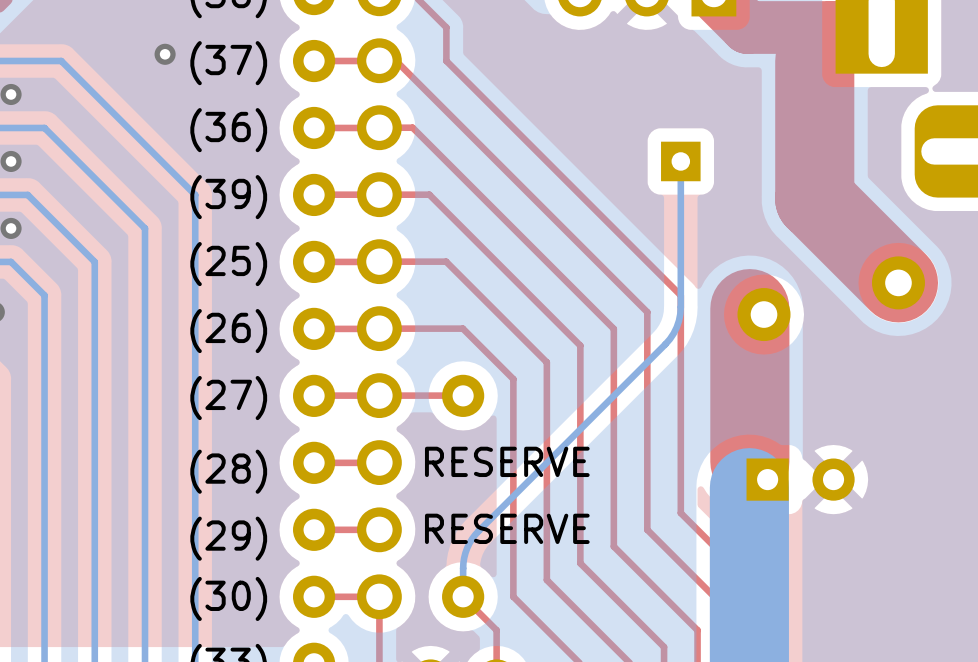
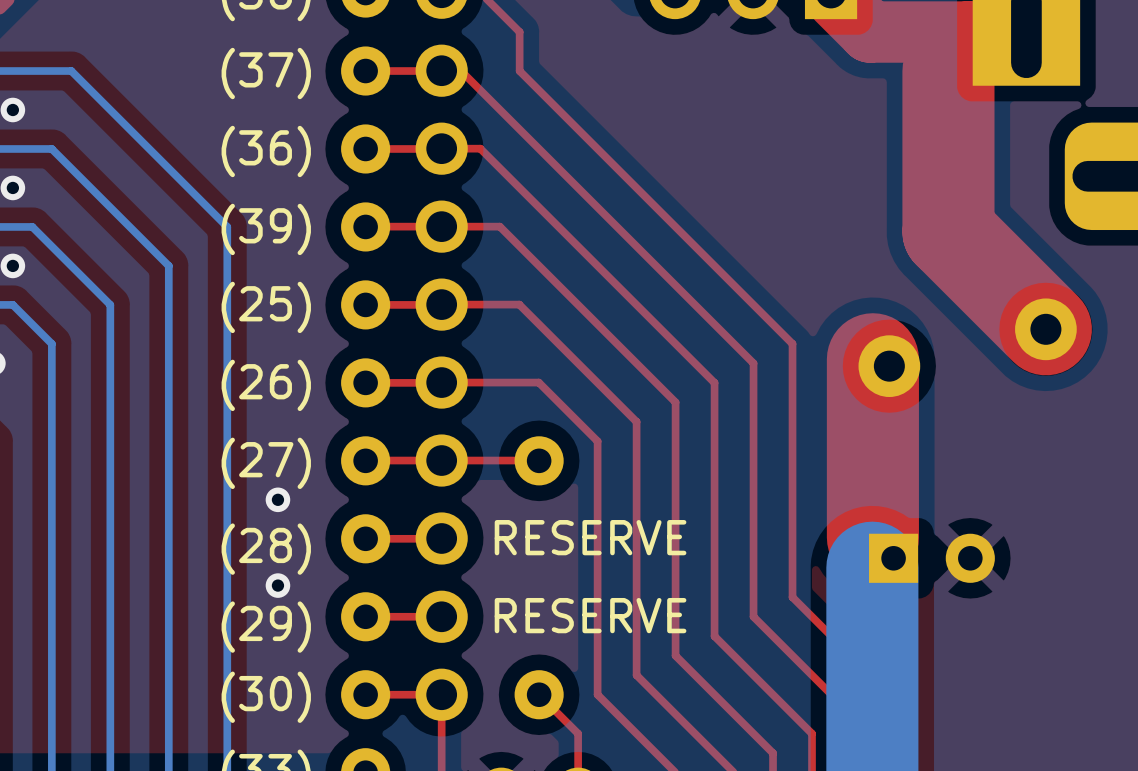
via: (165, 54) -> none
bottom track: (680, 161) (680, 307) (679, 320) (673, 333) (665, 344) (475, 534) (469, 543) (464, 558) (463, 596) -> none
part: (680, 161) -> none
via: none -> (277, 499)
via: none -> (277, 585)

